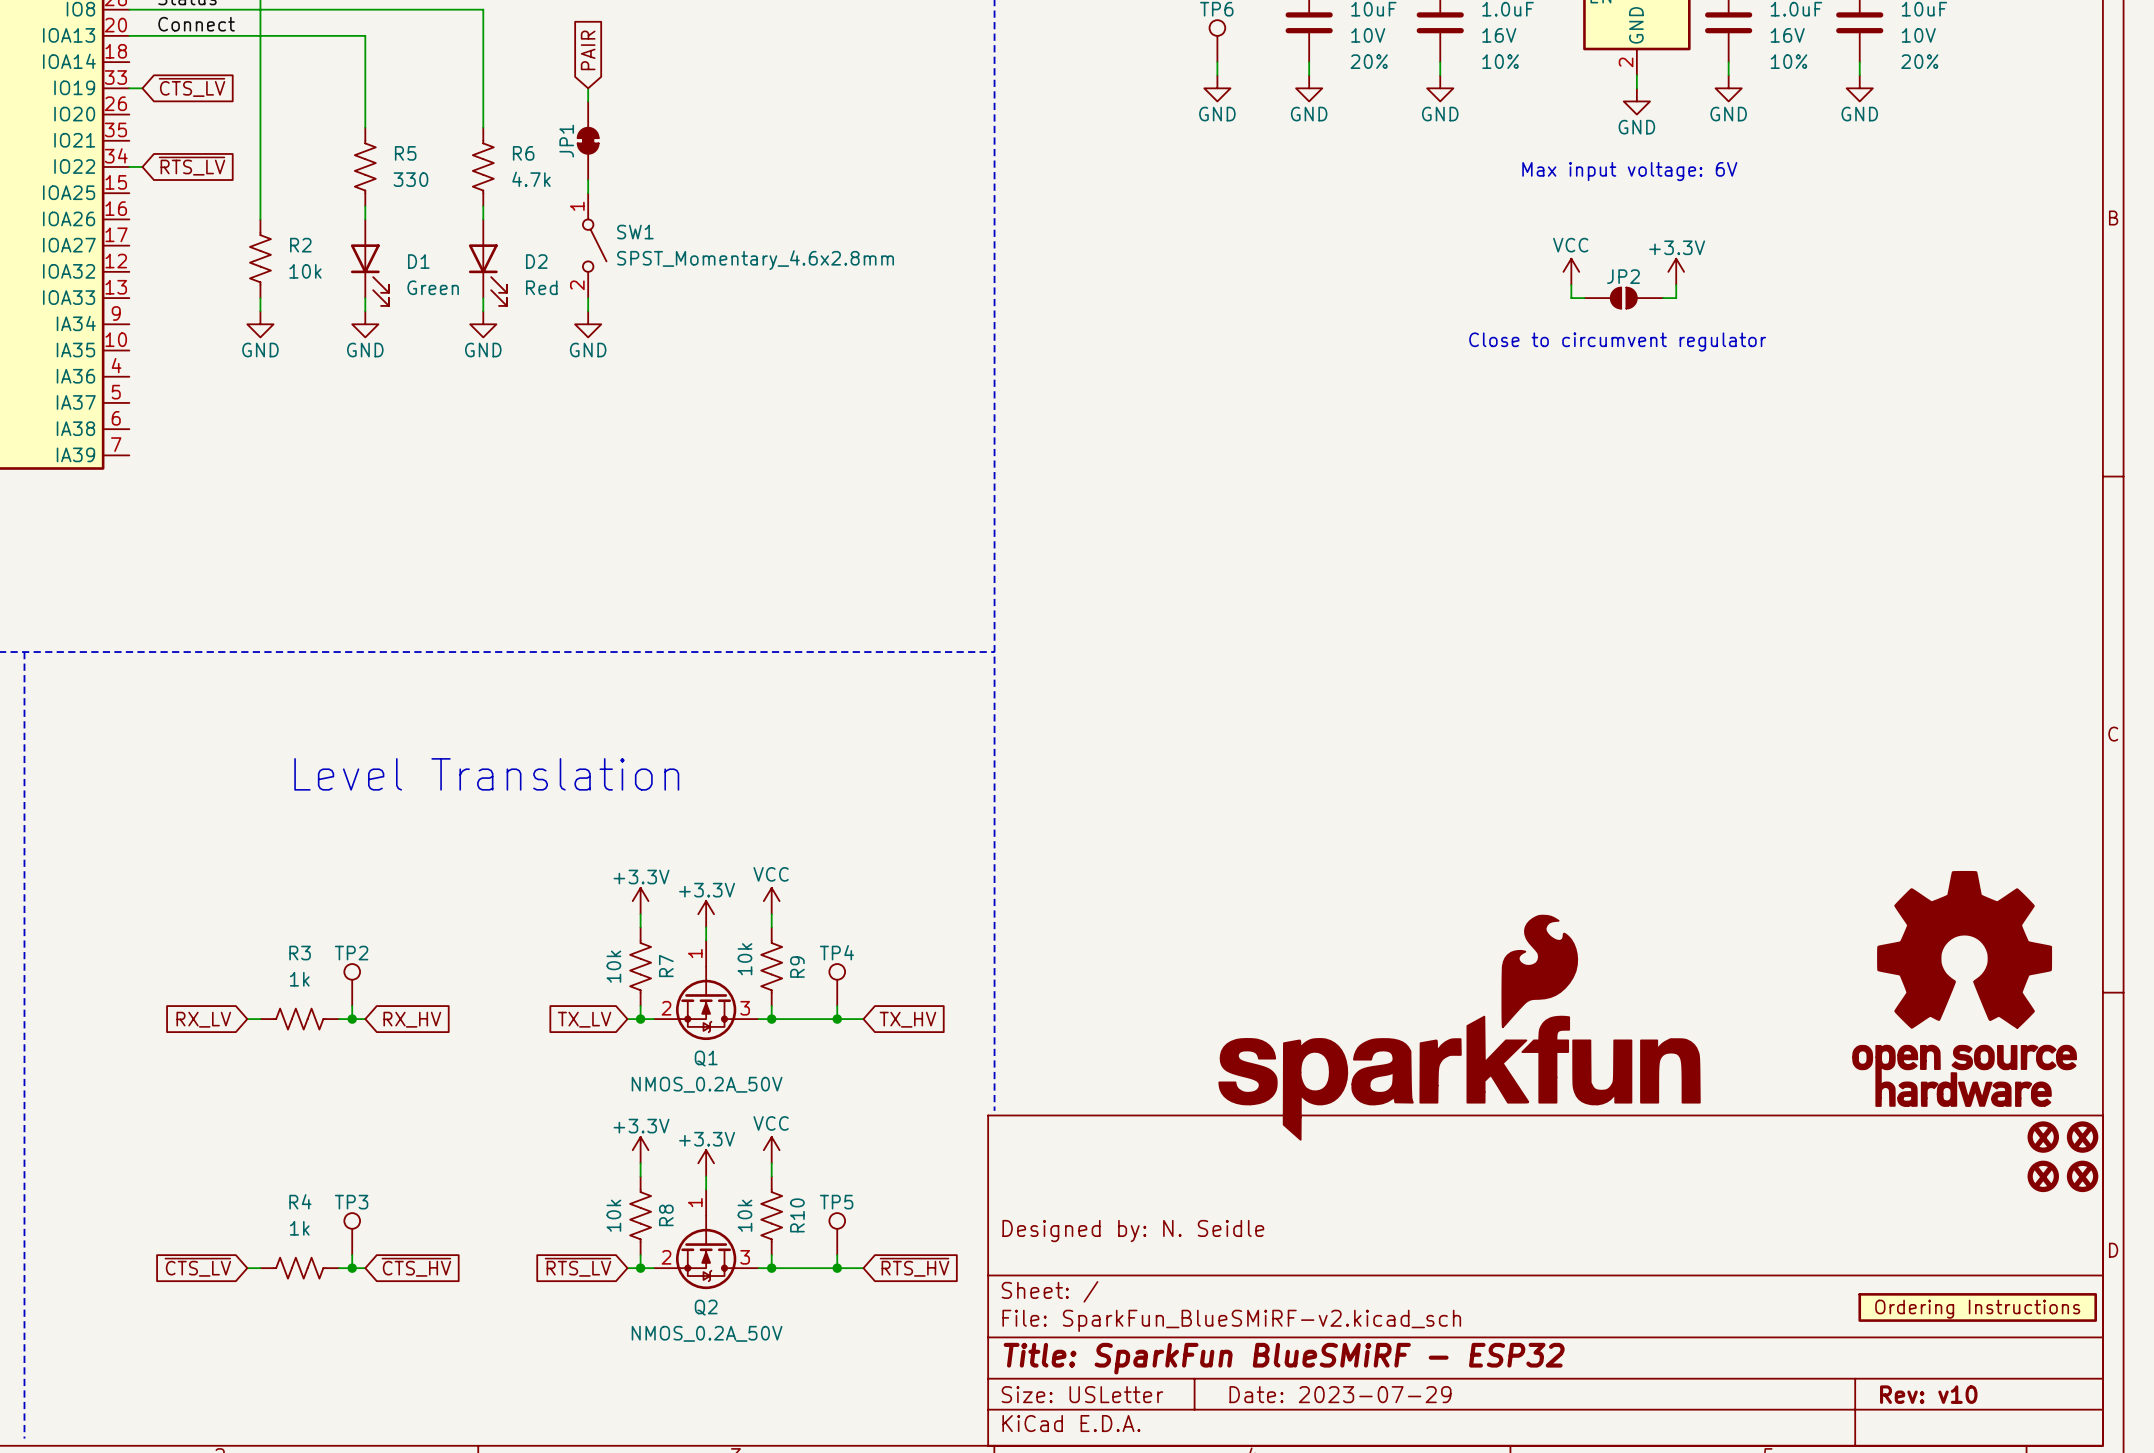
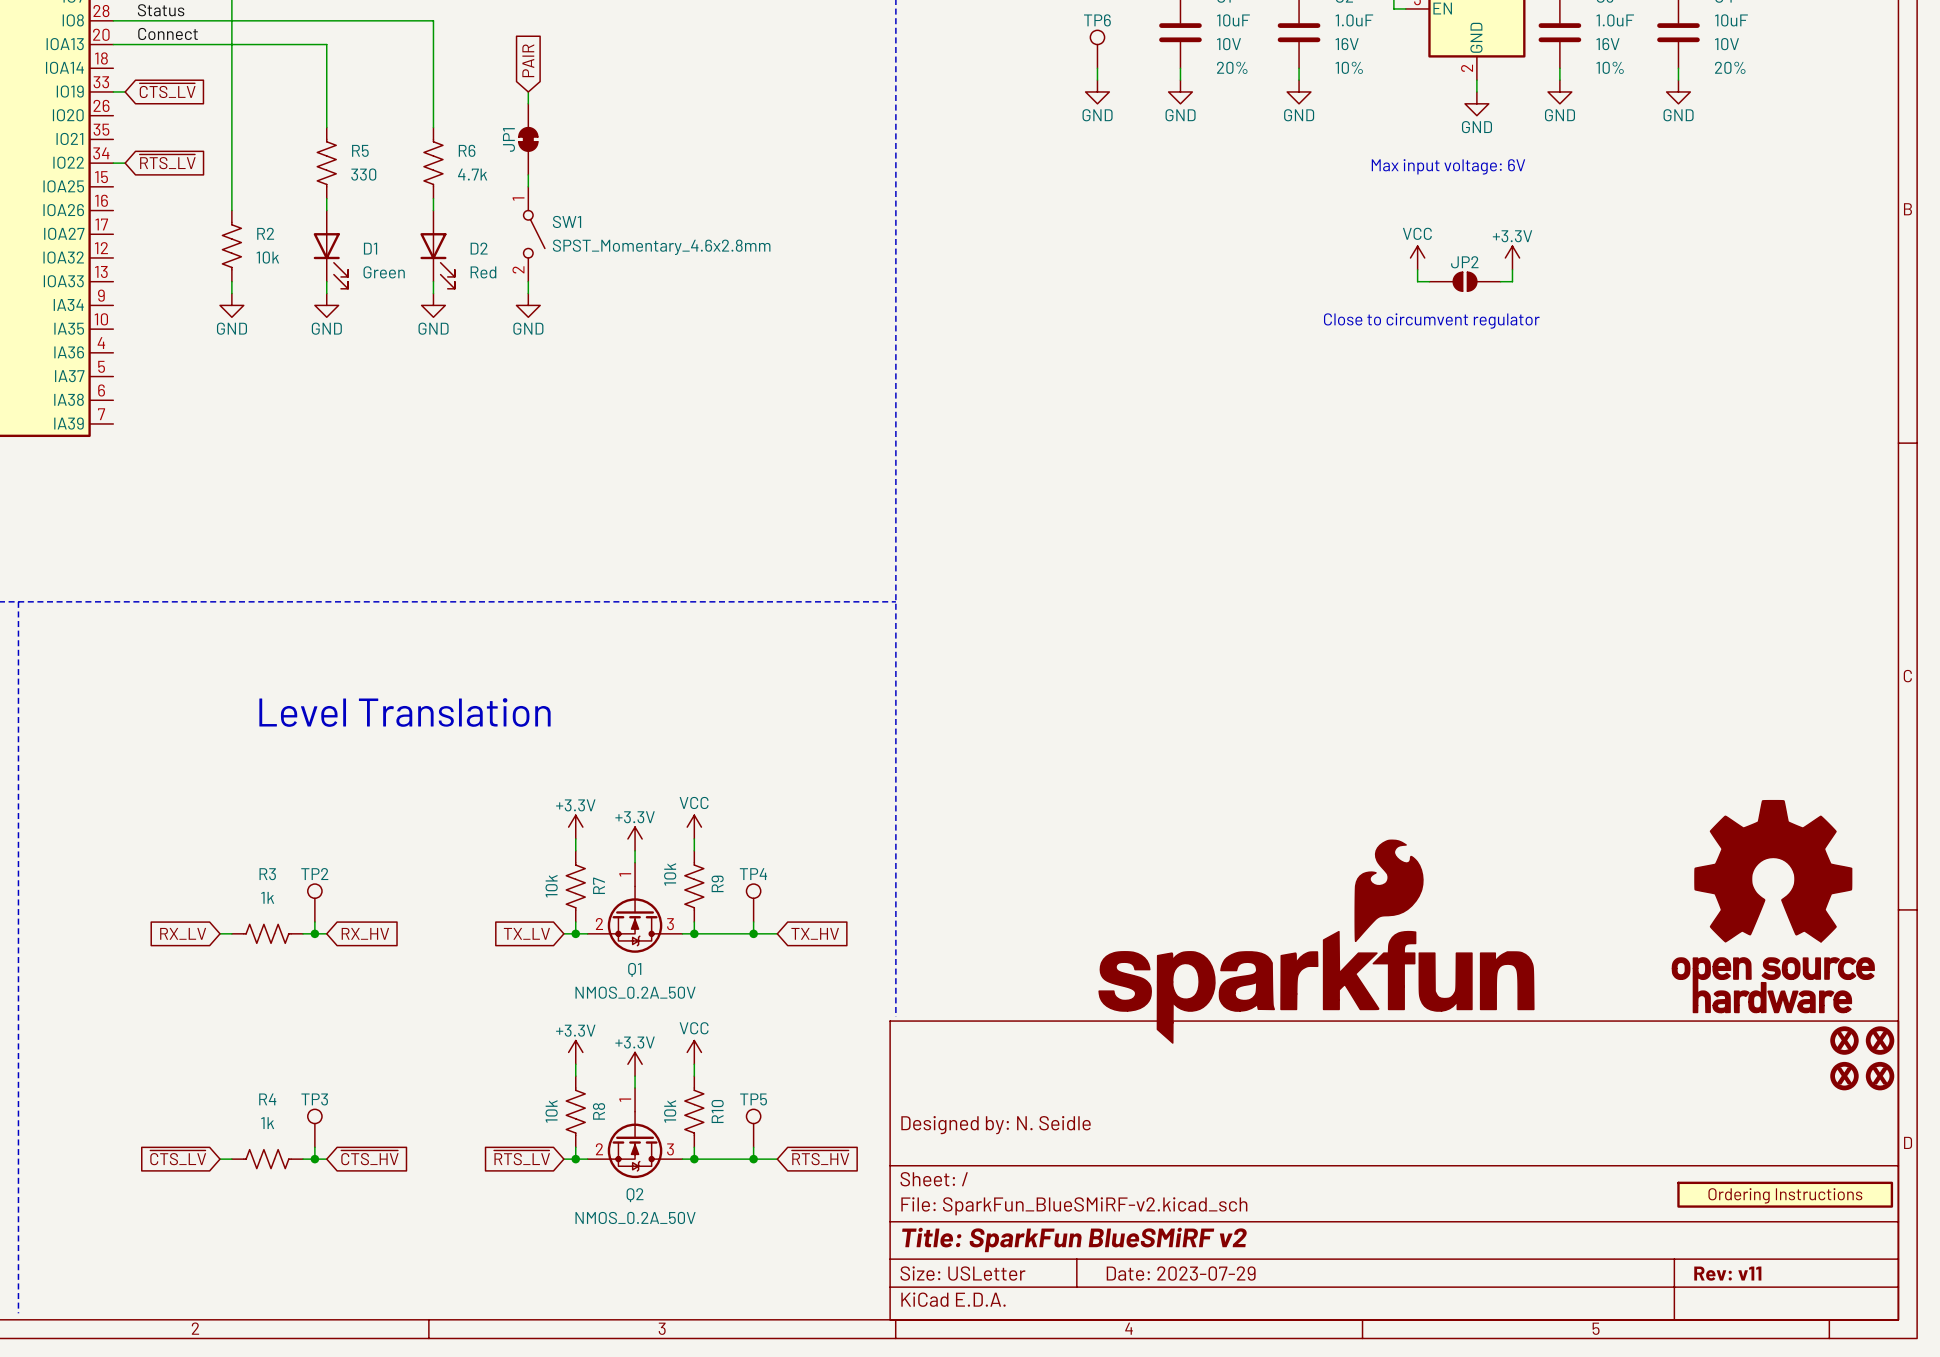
title block: Title: SparkFun BlueSMiRF - ESP32 (1284, 1358) -> Title: SparkFun BlueSMiRF v2 (1074, 1239)
title block: Rev: v10 (1928, 1394) -> Rev: v11 (1727, 1273)

